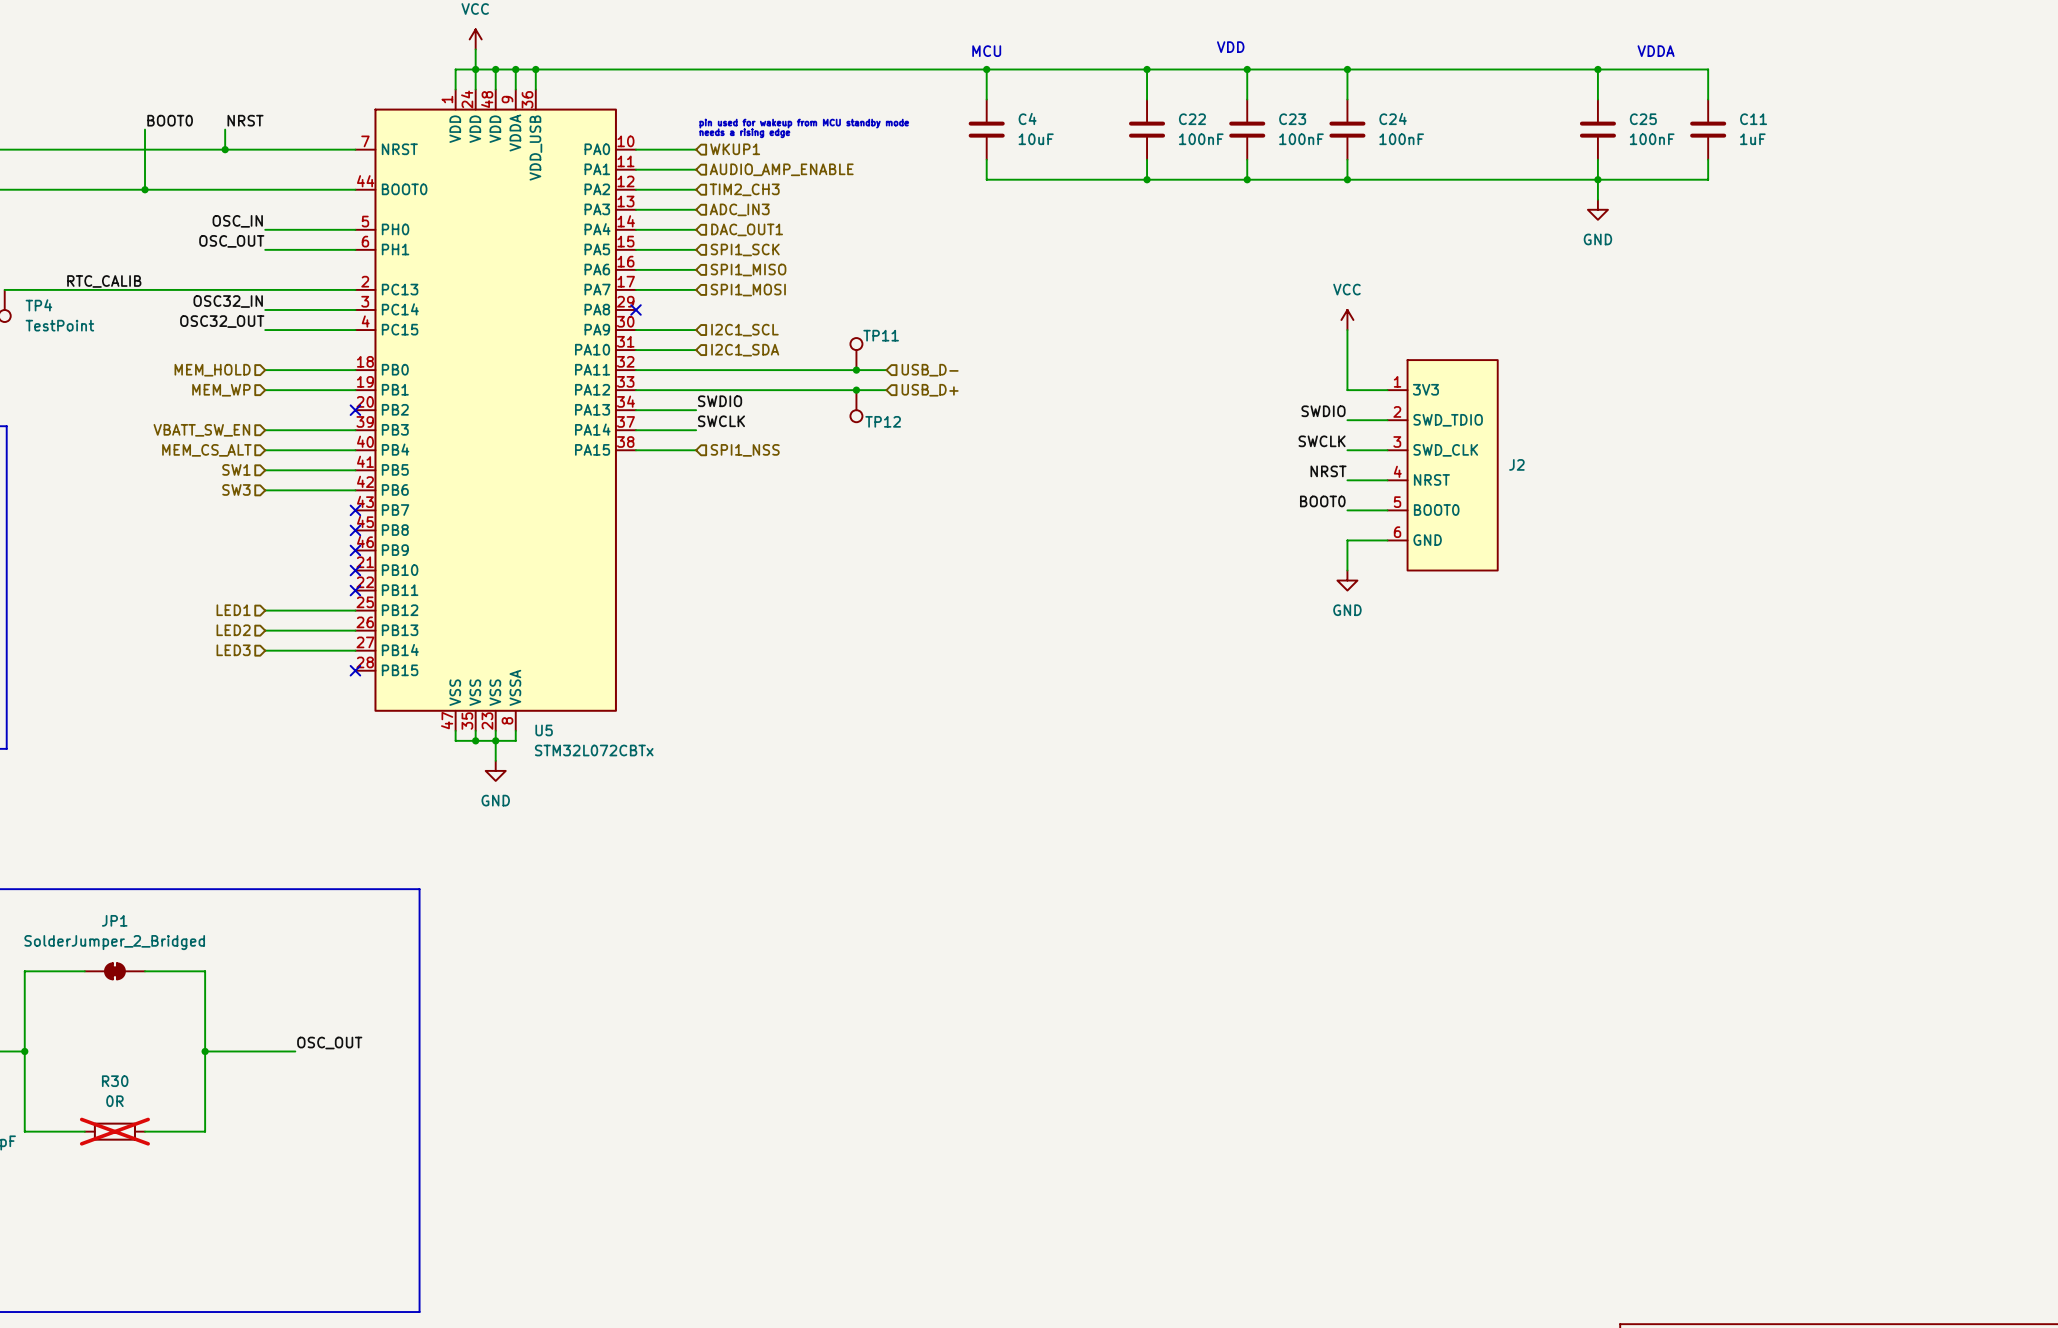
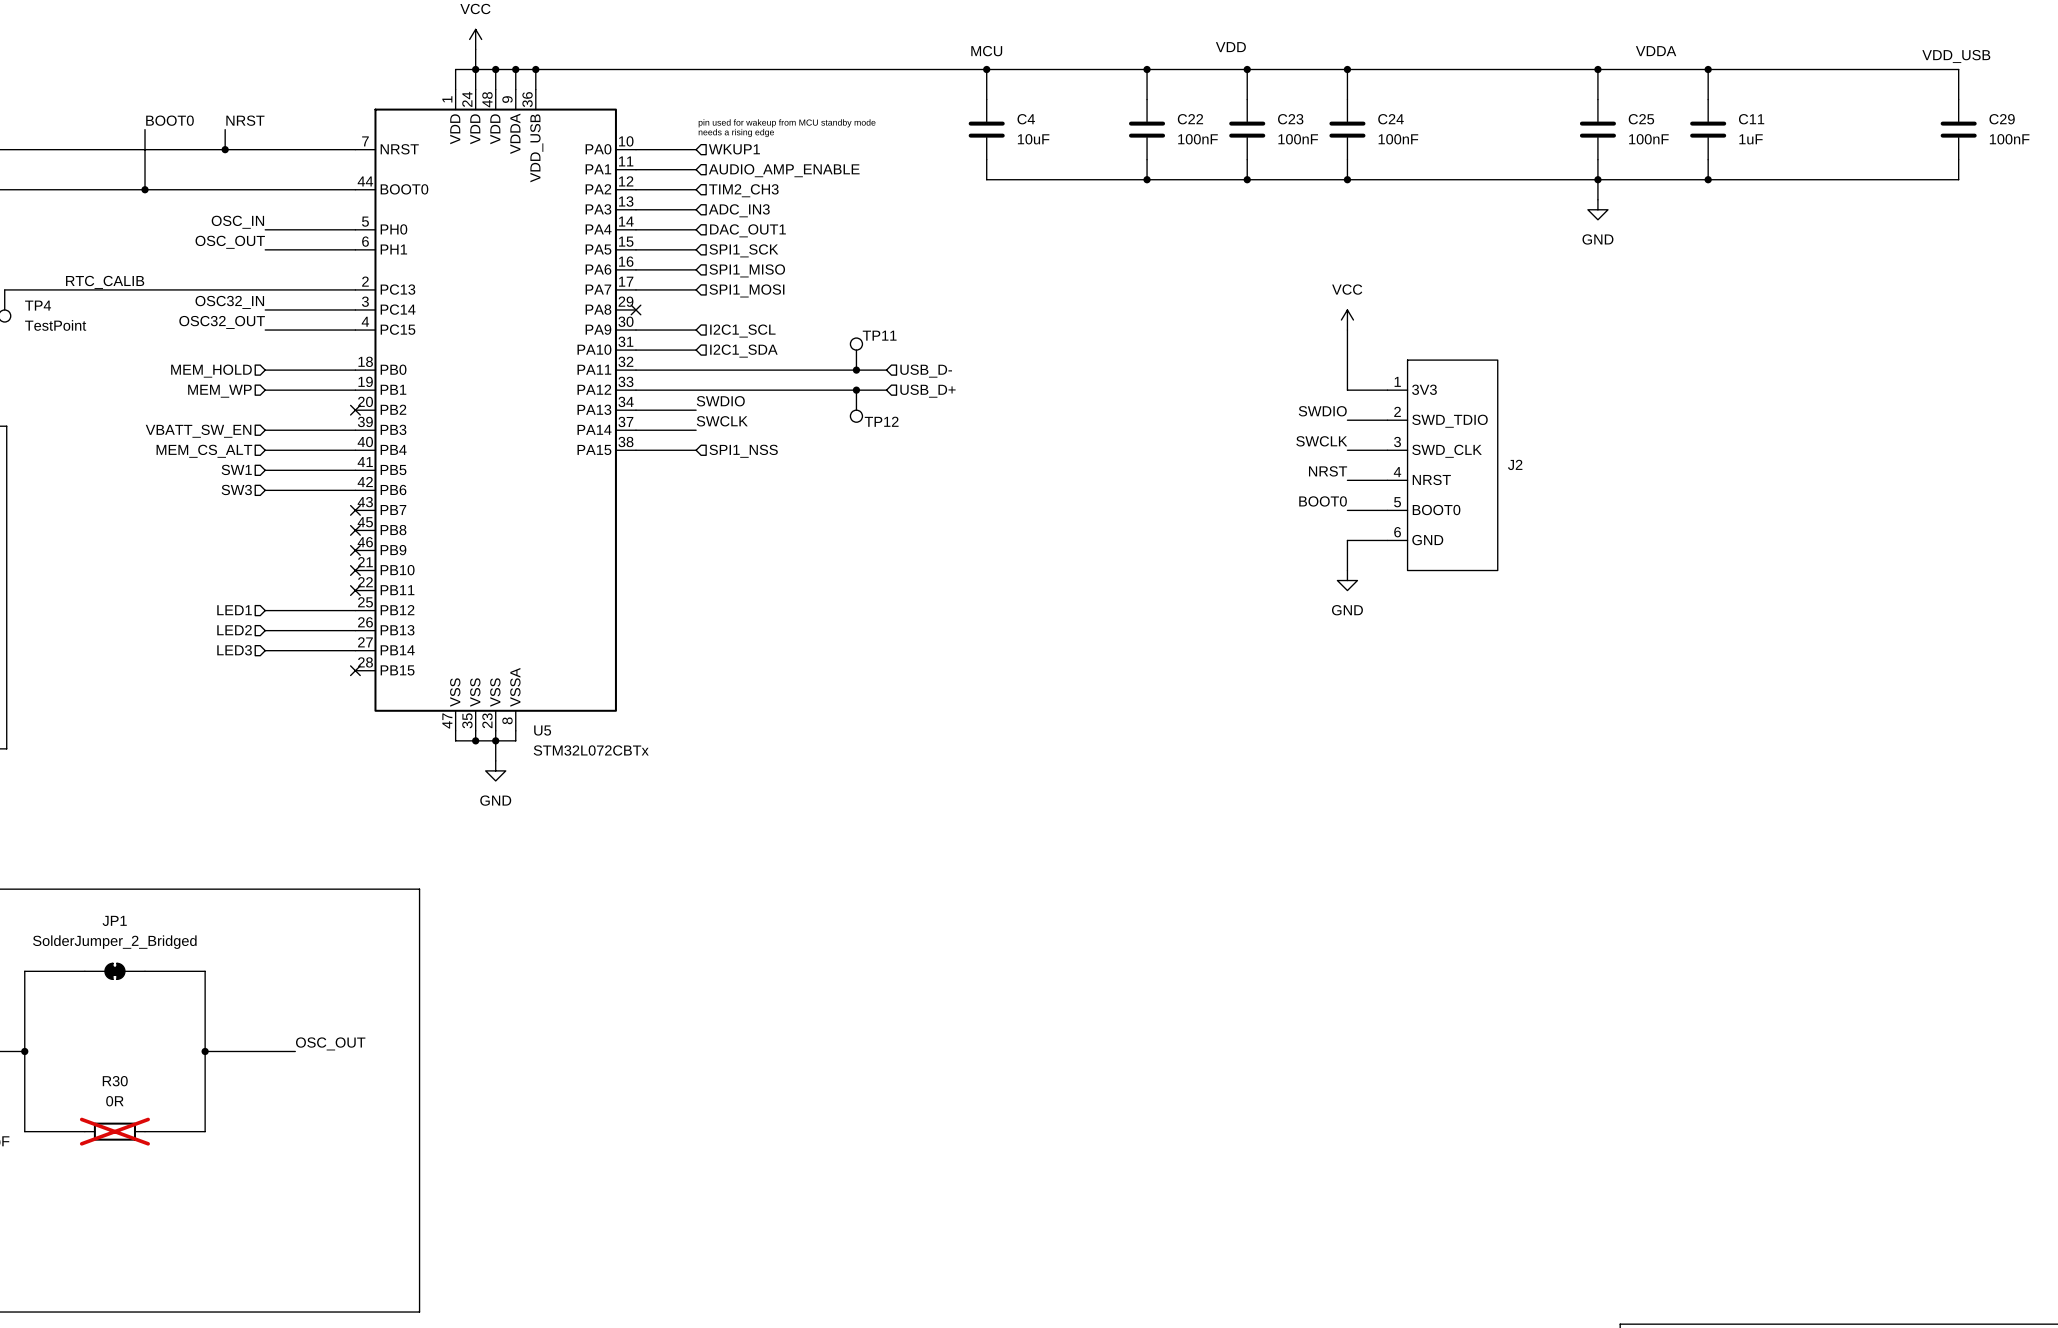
text: none -> VDD_USB (1956, 56)
wire: none -> (1708, 69) (1958, 69) (1958, 99)
junction: none -> (1708, 69)
C29: none -> 100nF (1958, 129)
wire: none -> (1958, 159) (1958, 179) (1708, 179)
junction: none -> (1708, 179)

